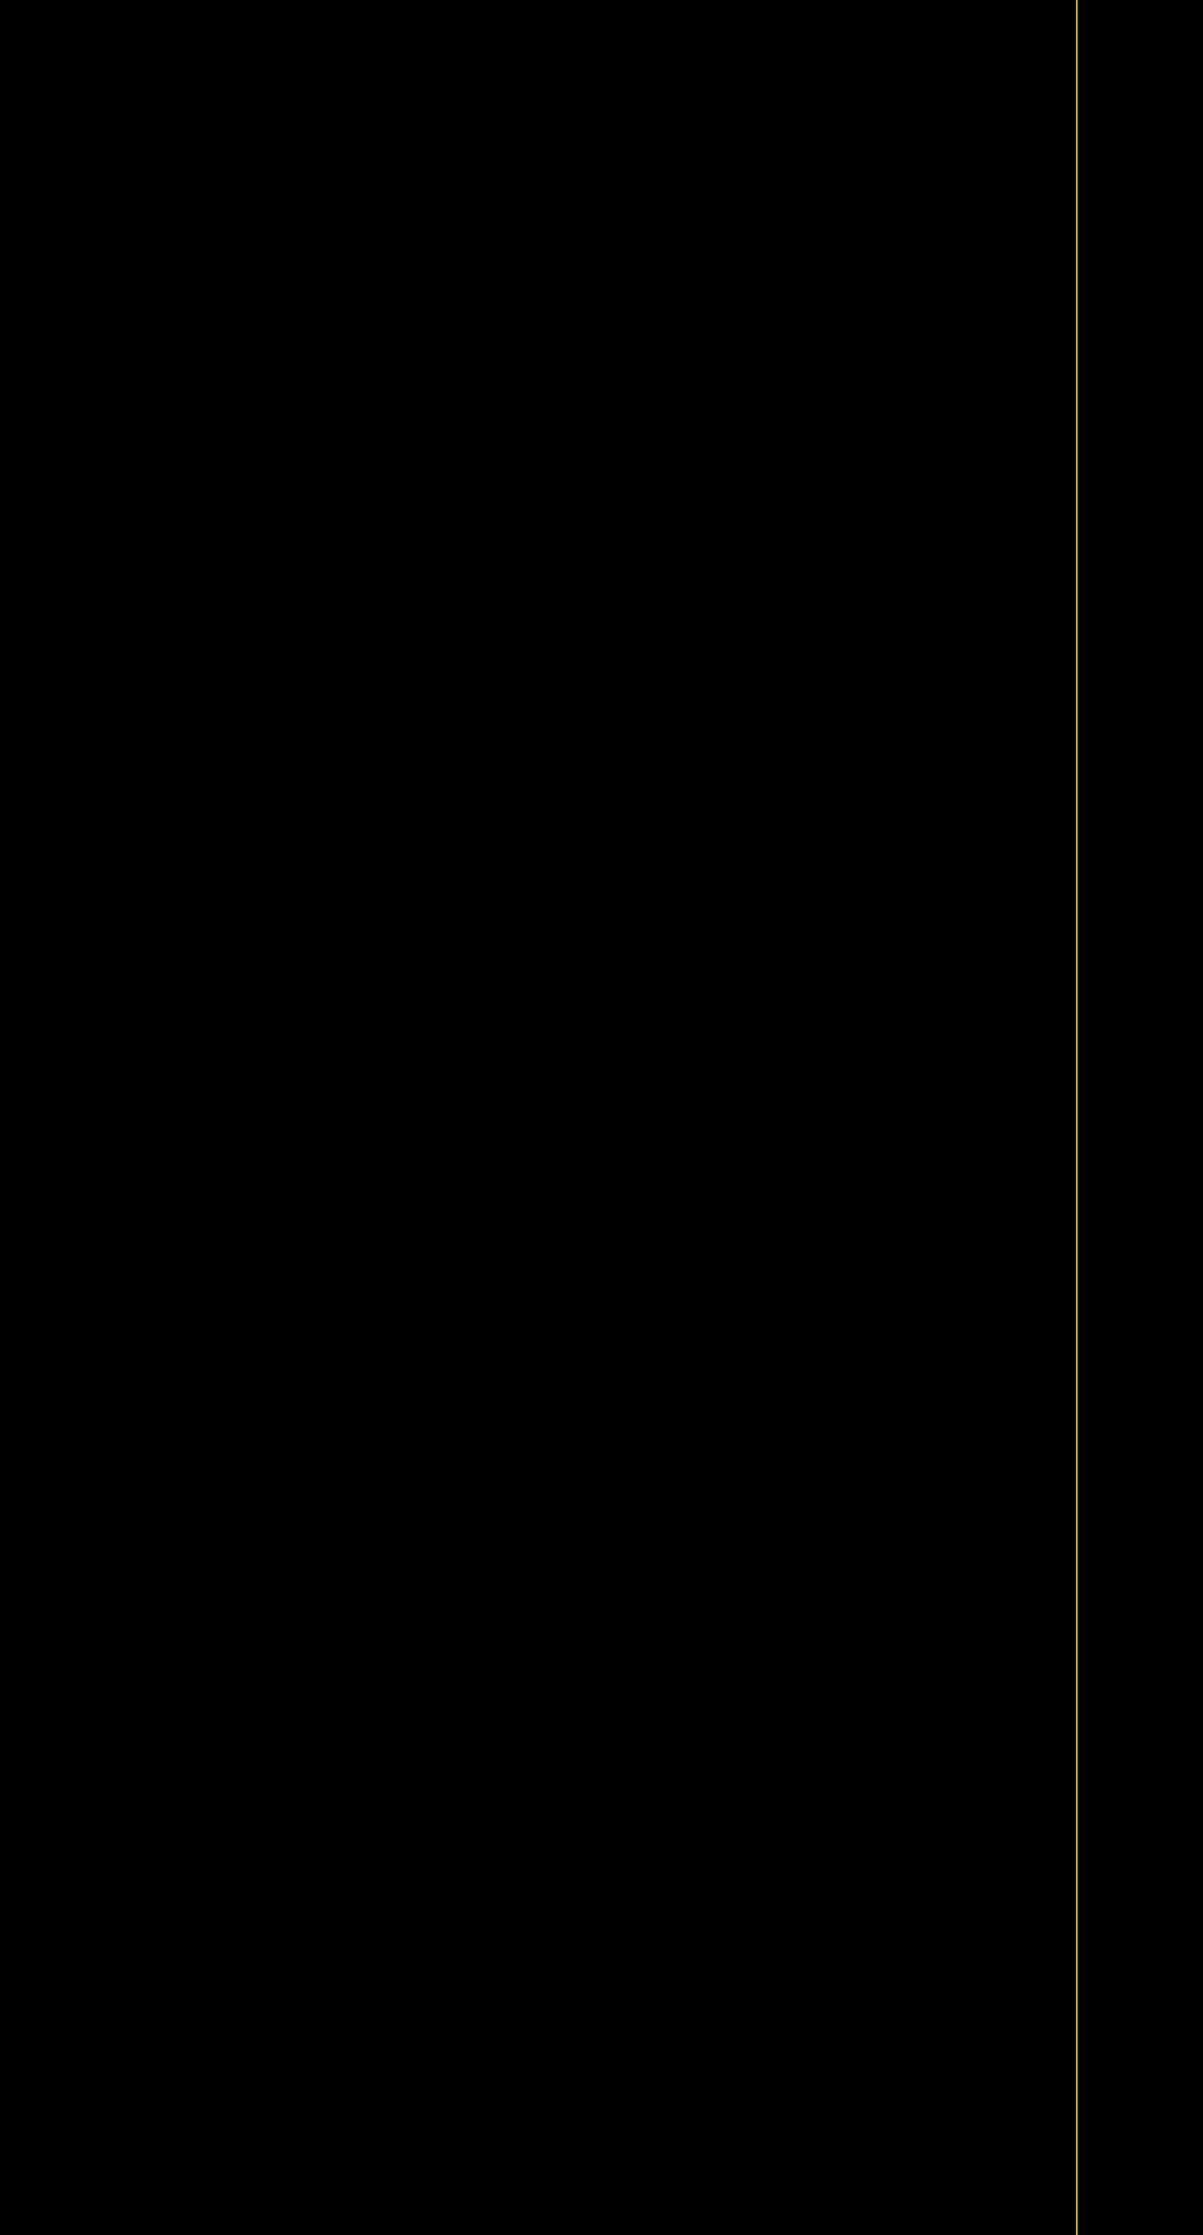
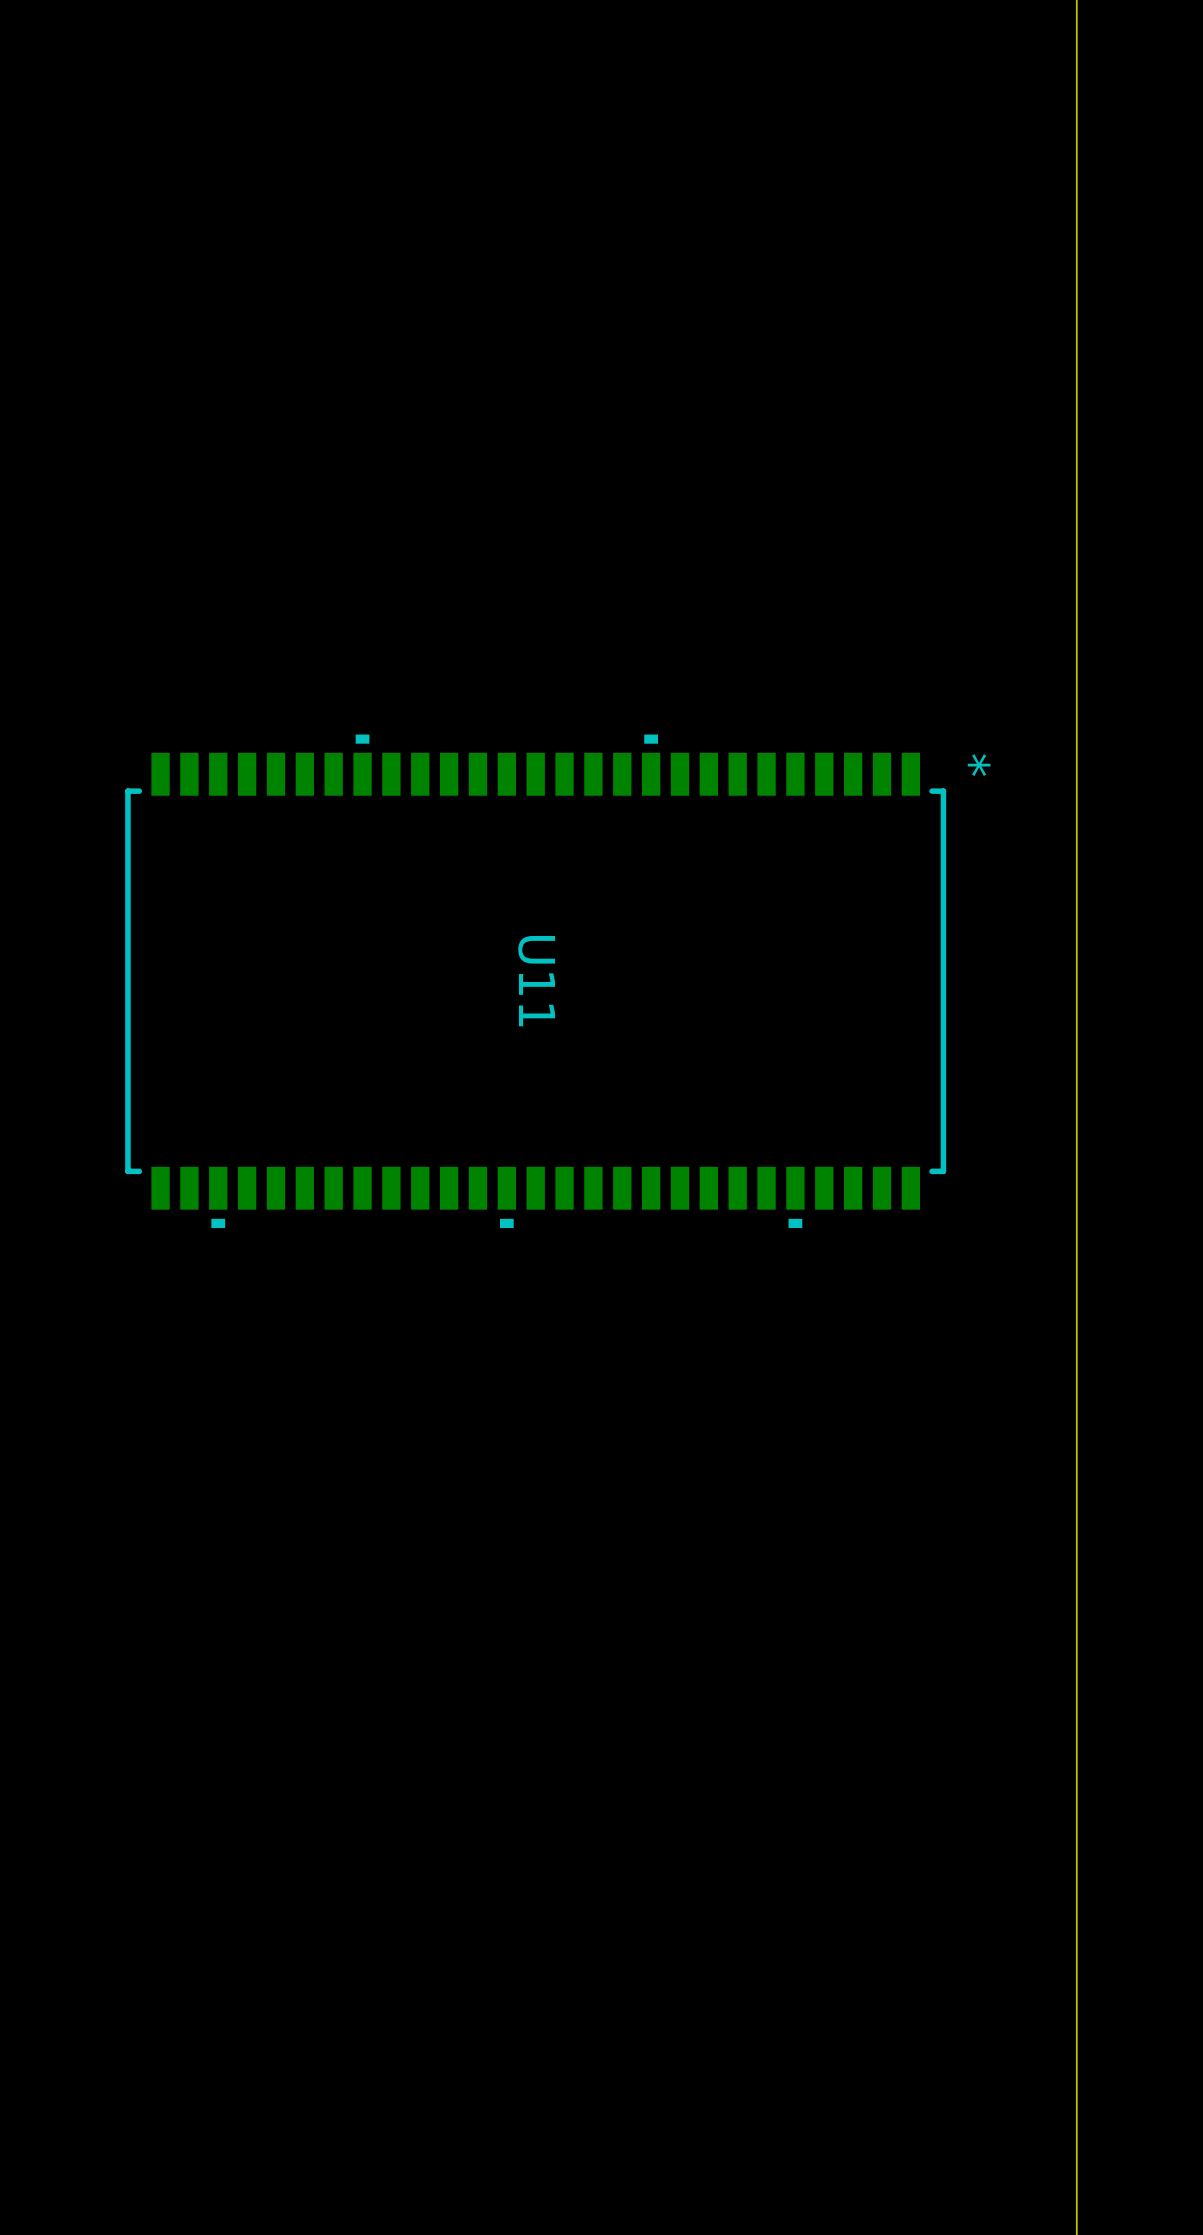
U11: none -> (535, 981)

